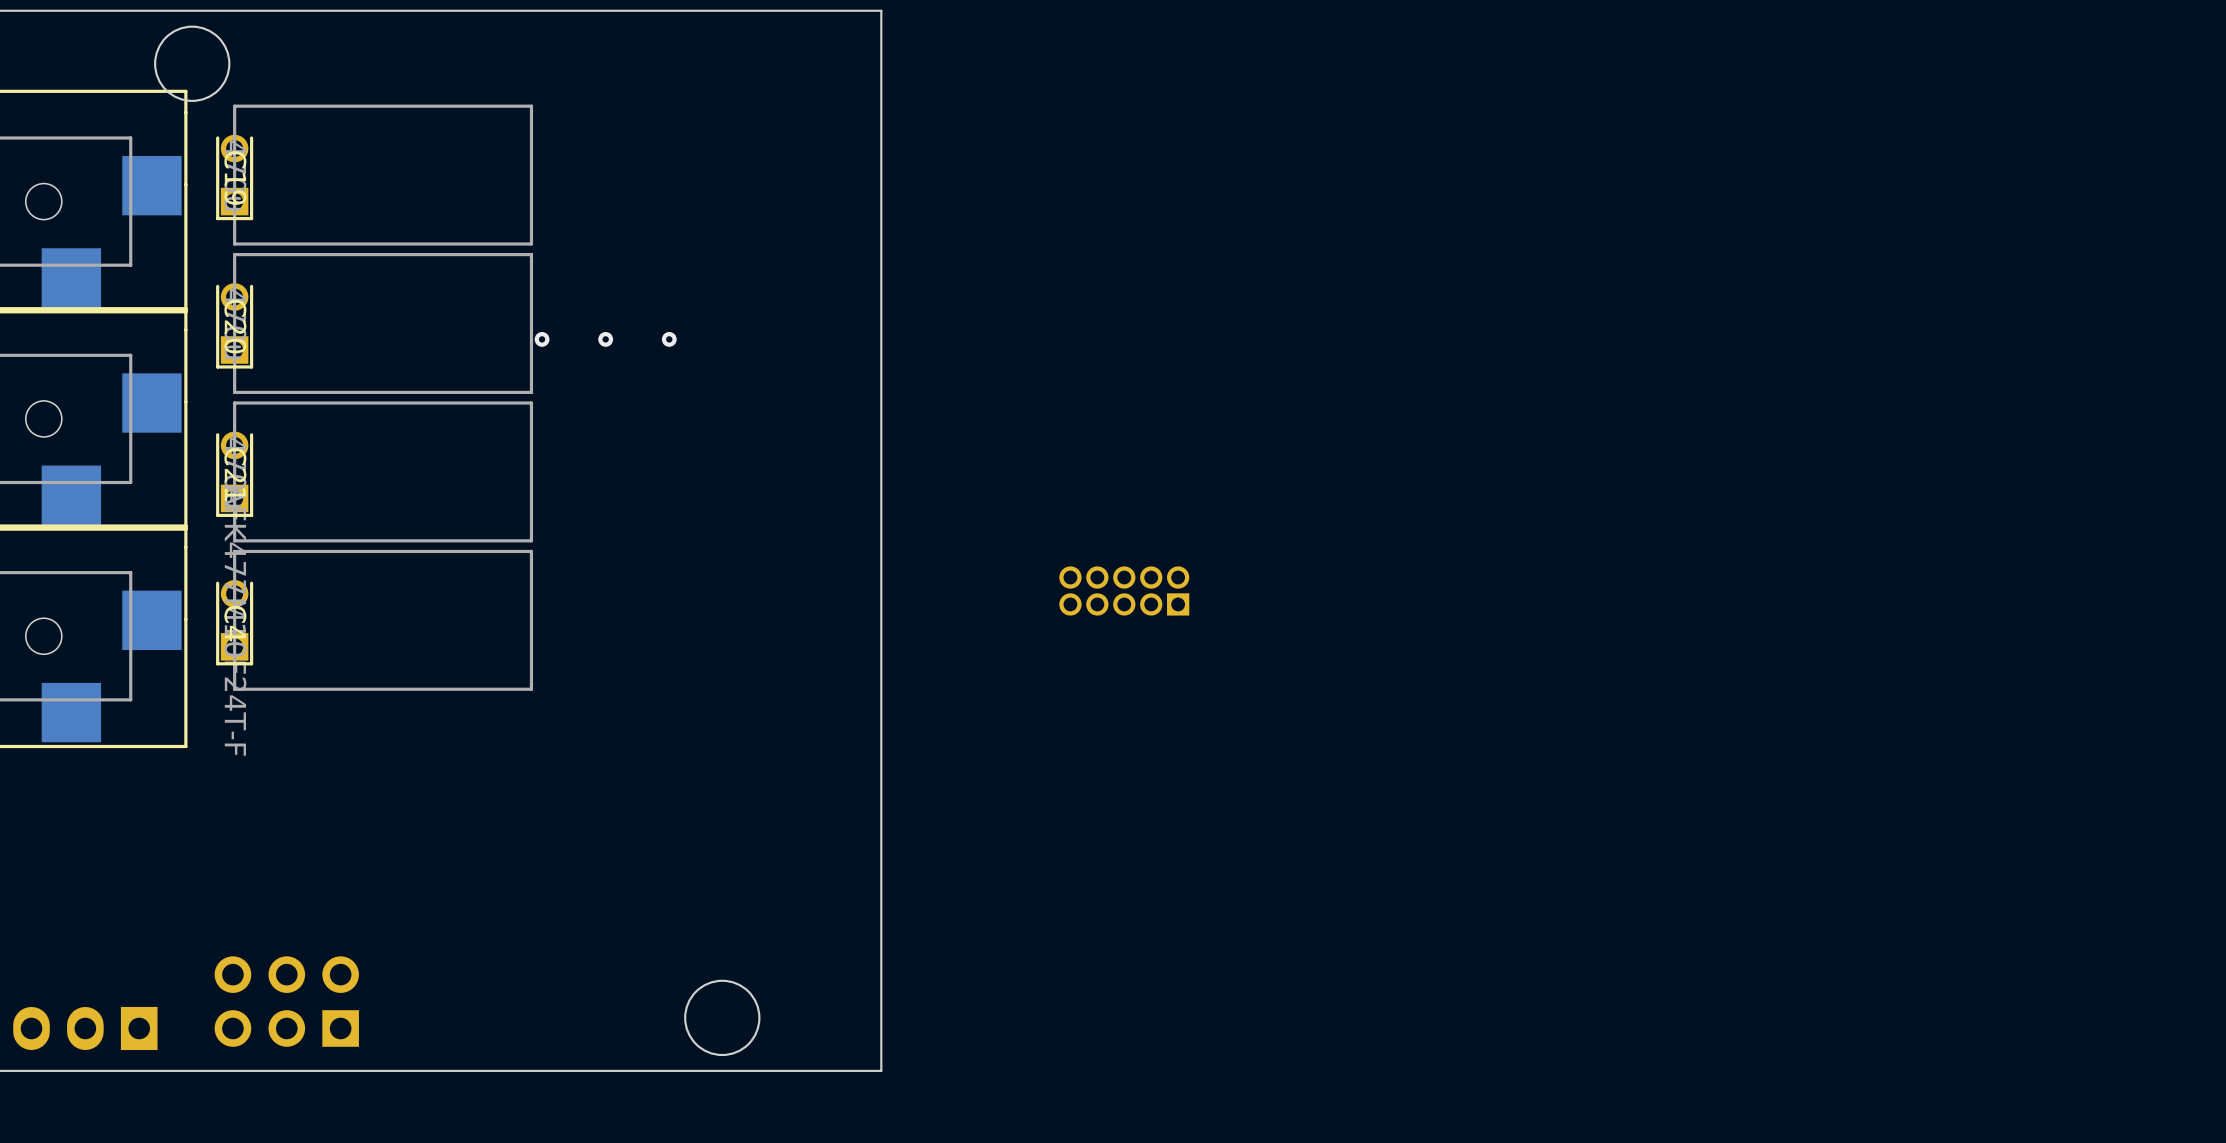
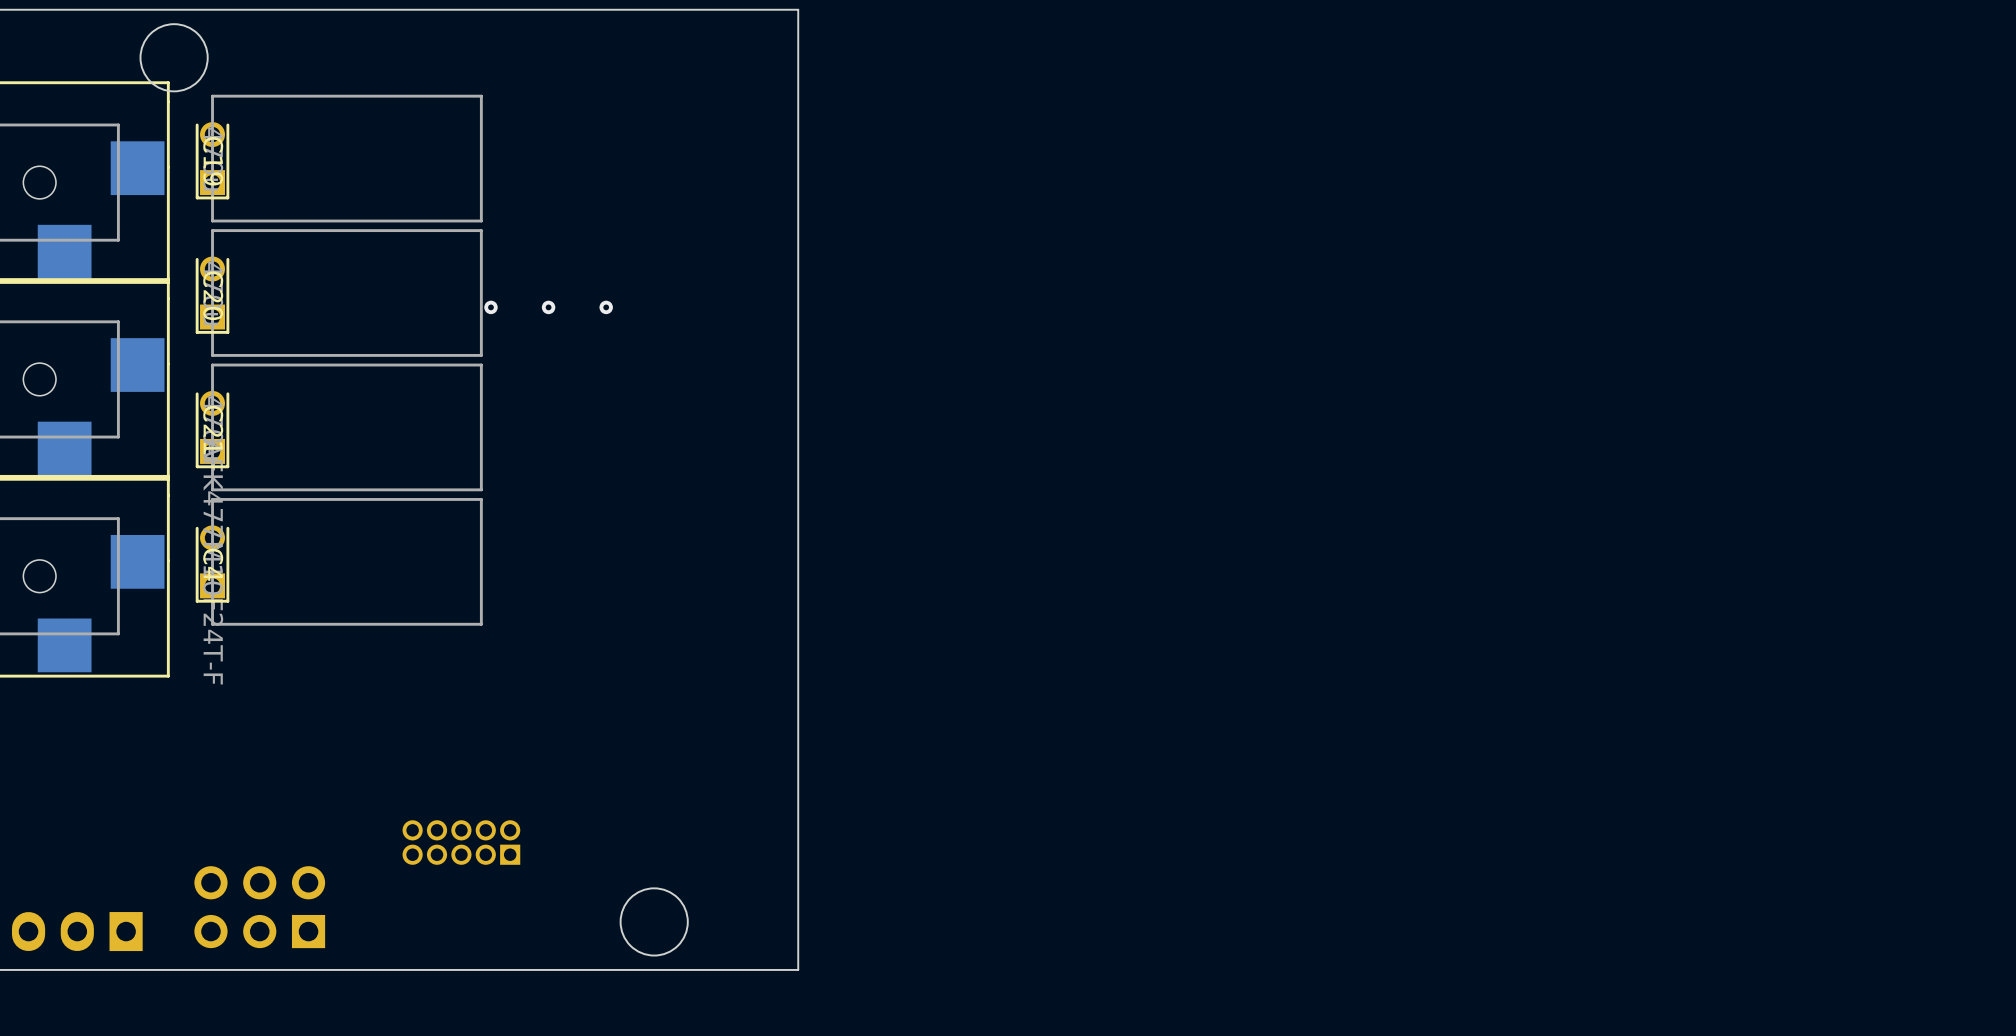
part: (1124, 590) -> none
part: none -> (461, 842)

